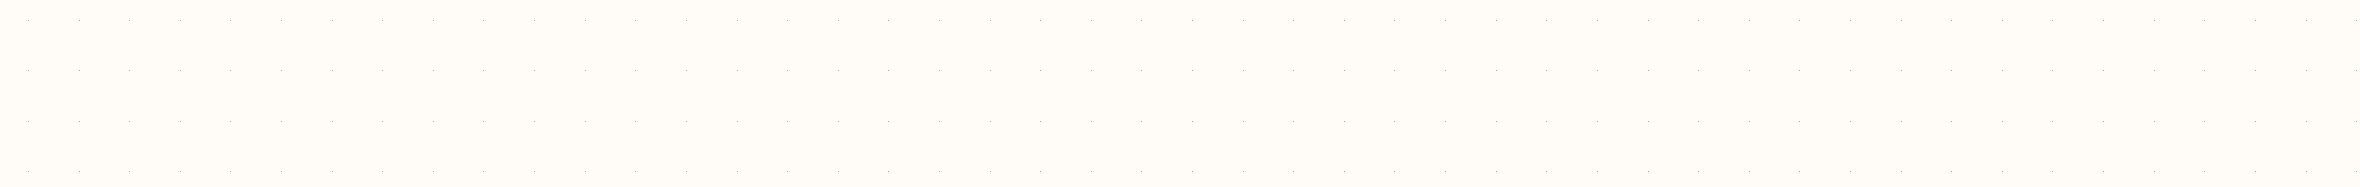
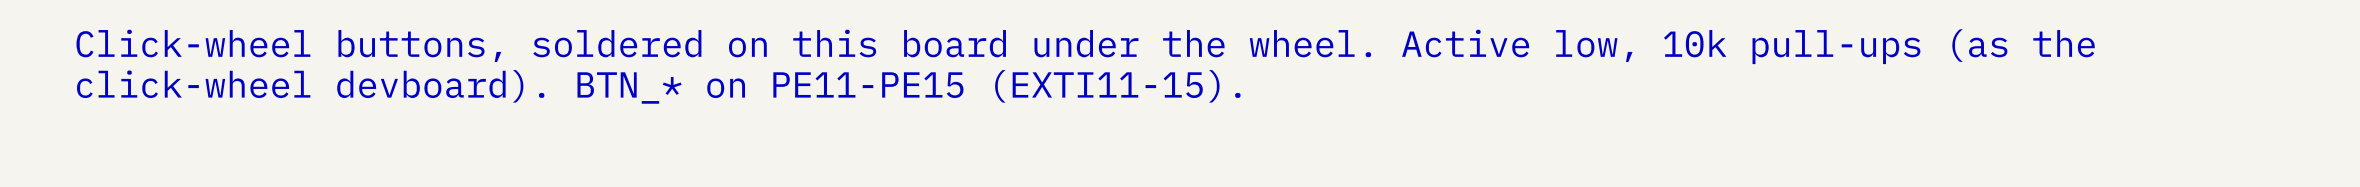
text: none -> Click-wheel buttons, soldered on this board under the wheel. Active low, 10k pull-ups (as the (1085, 46)
text: none -> click-wheel devboard). BTN_* on PE11-PE15 (EXTI11-15). (658, 86)

